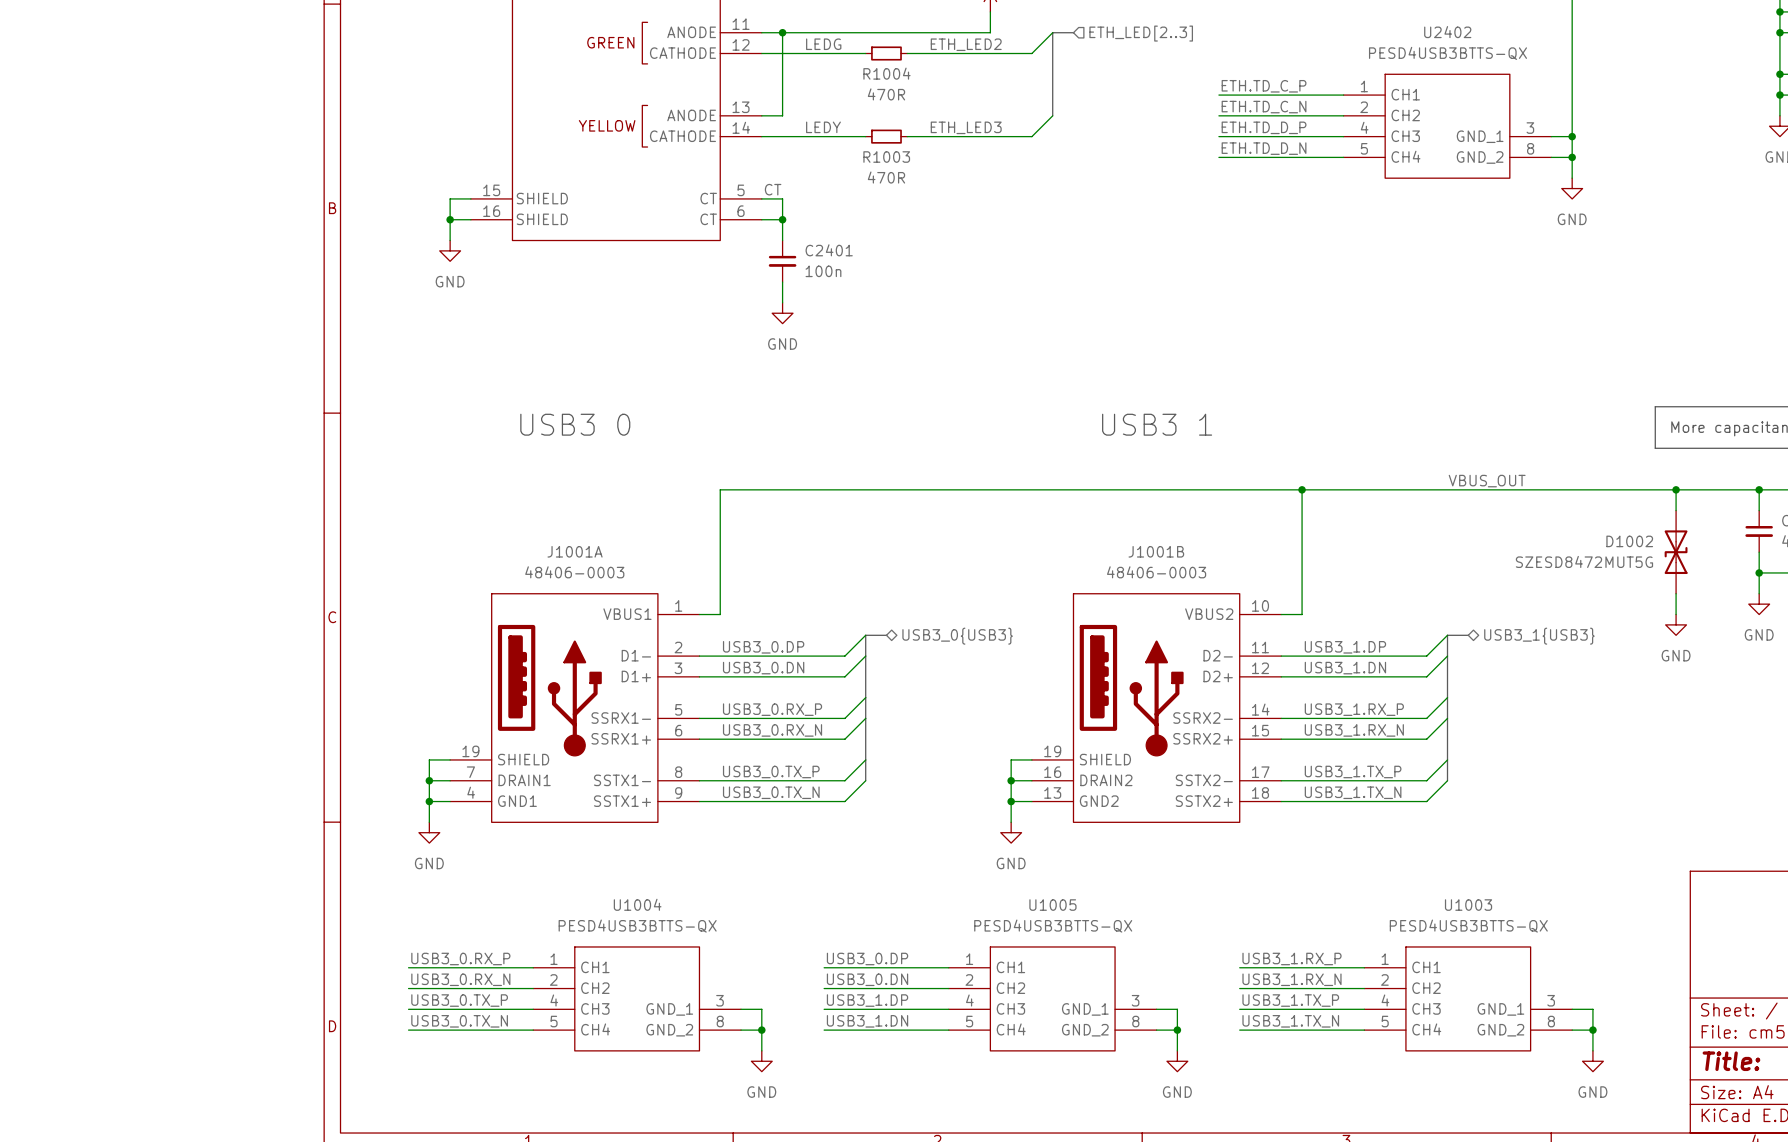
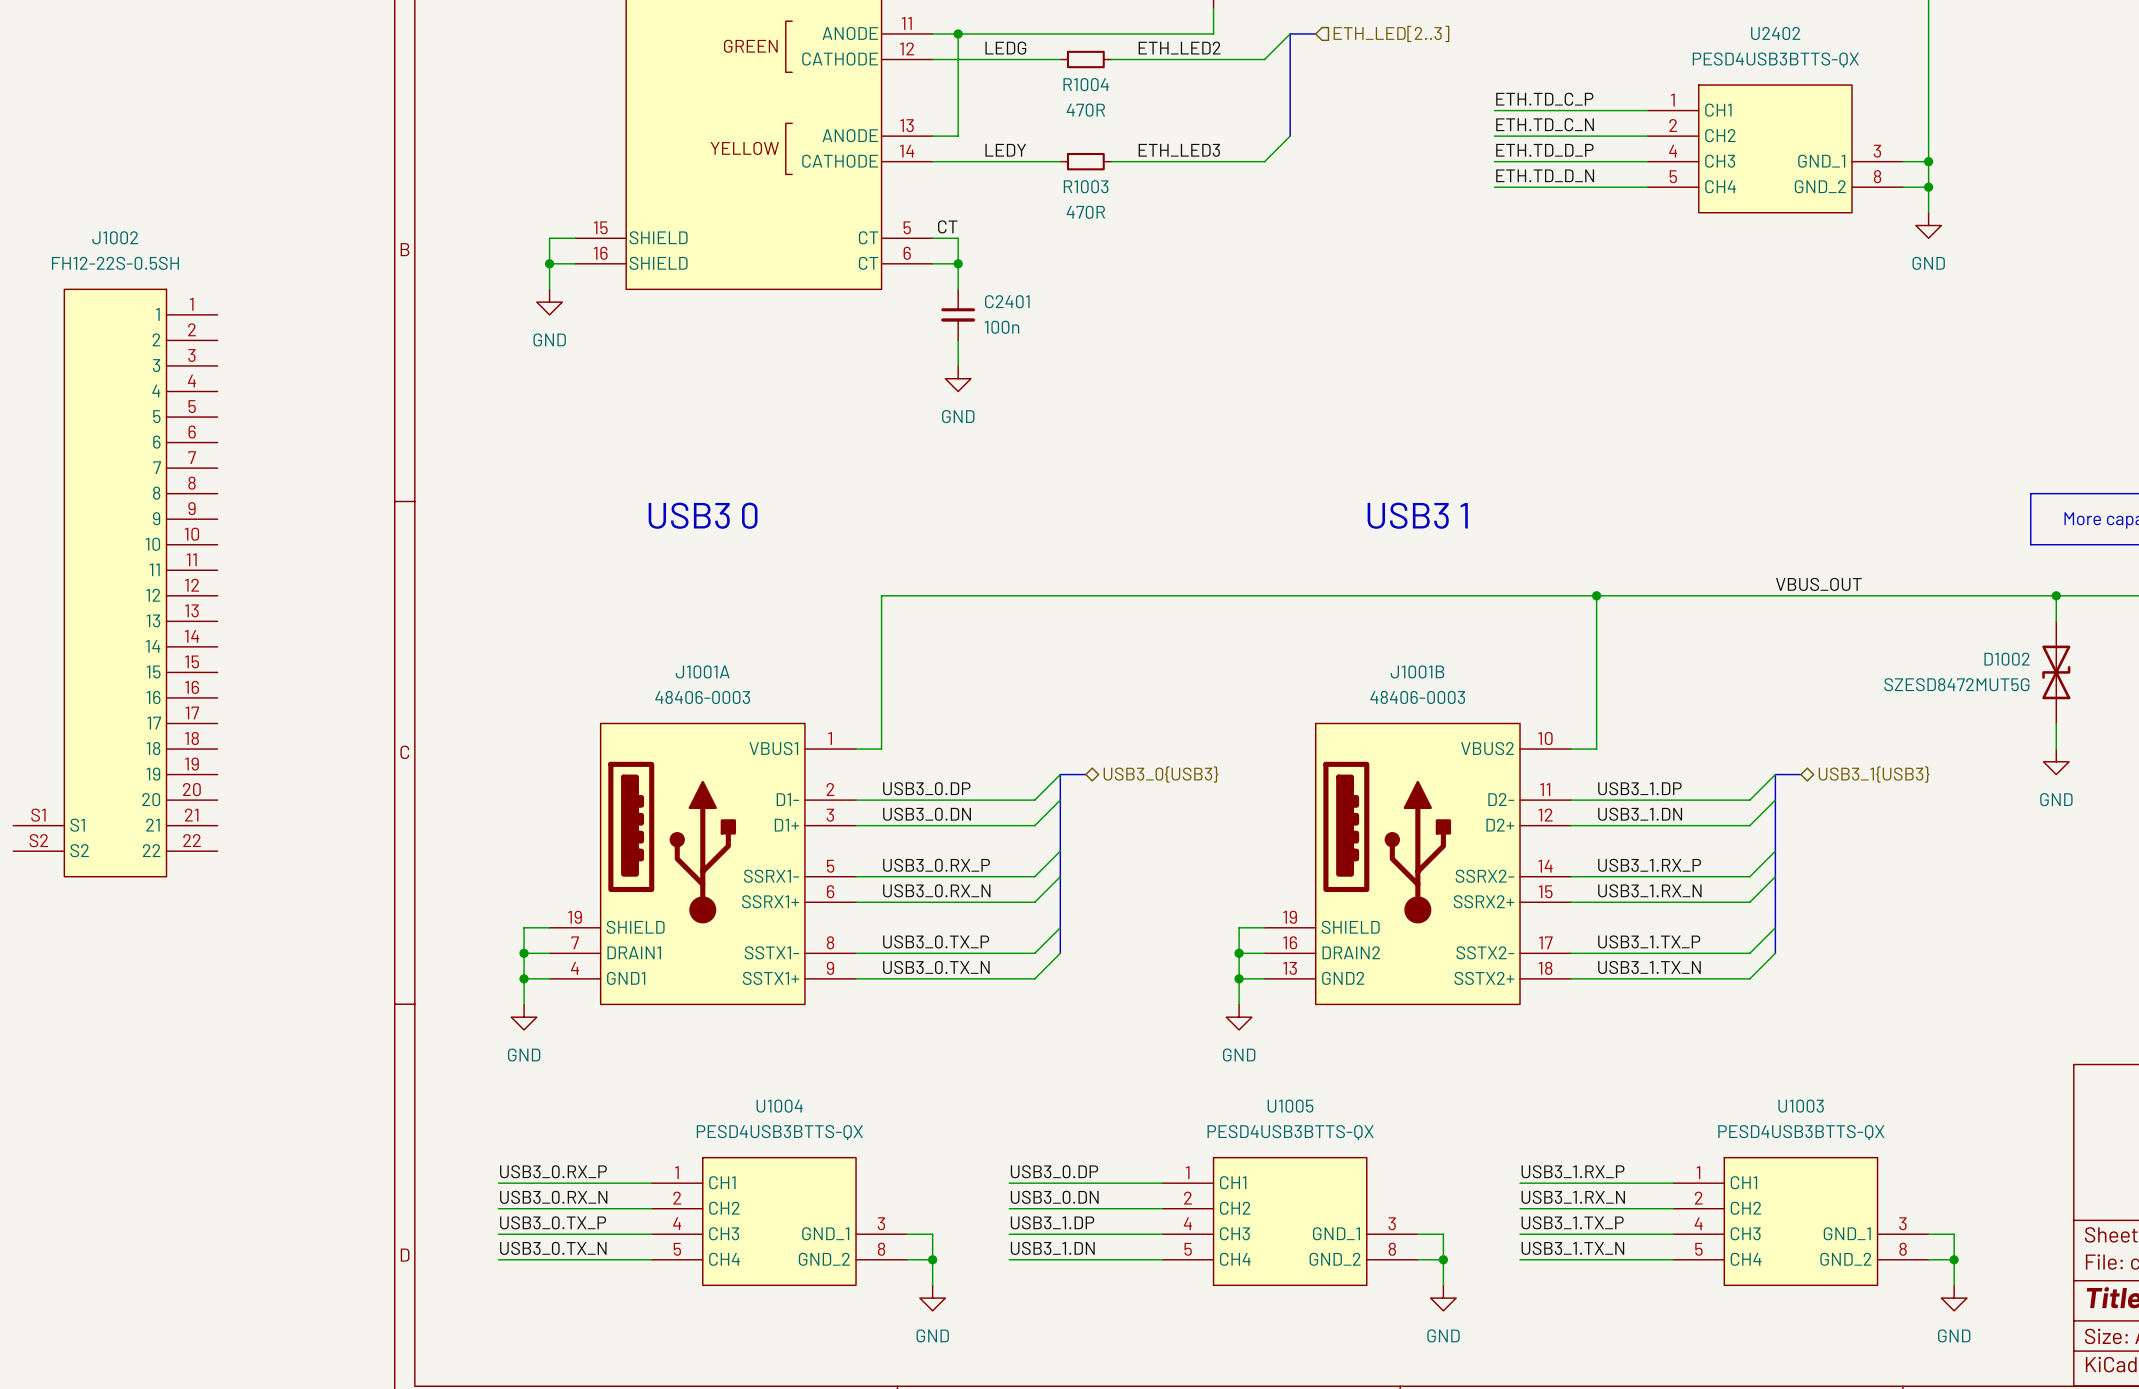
J1002: none -> FH12-22S-0.5SH (115, 583)

